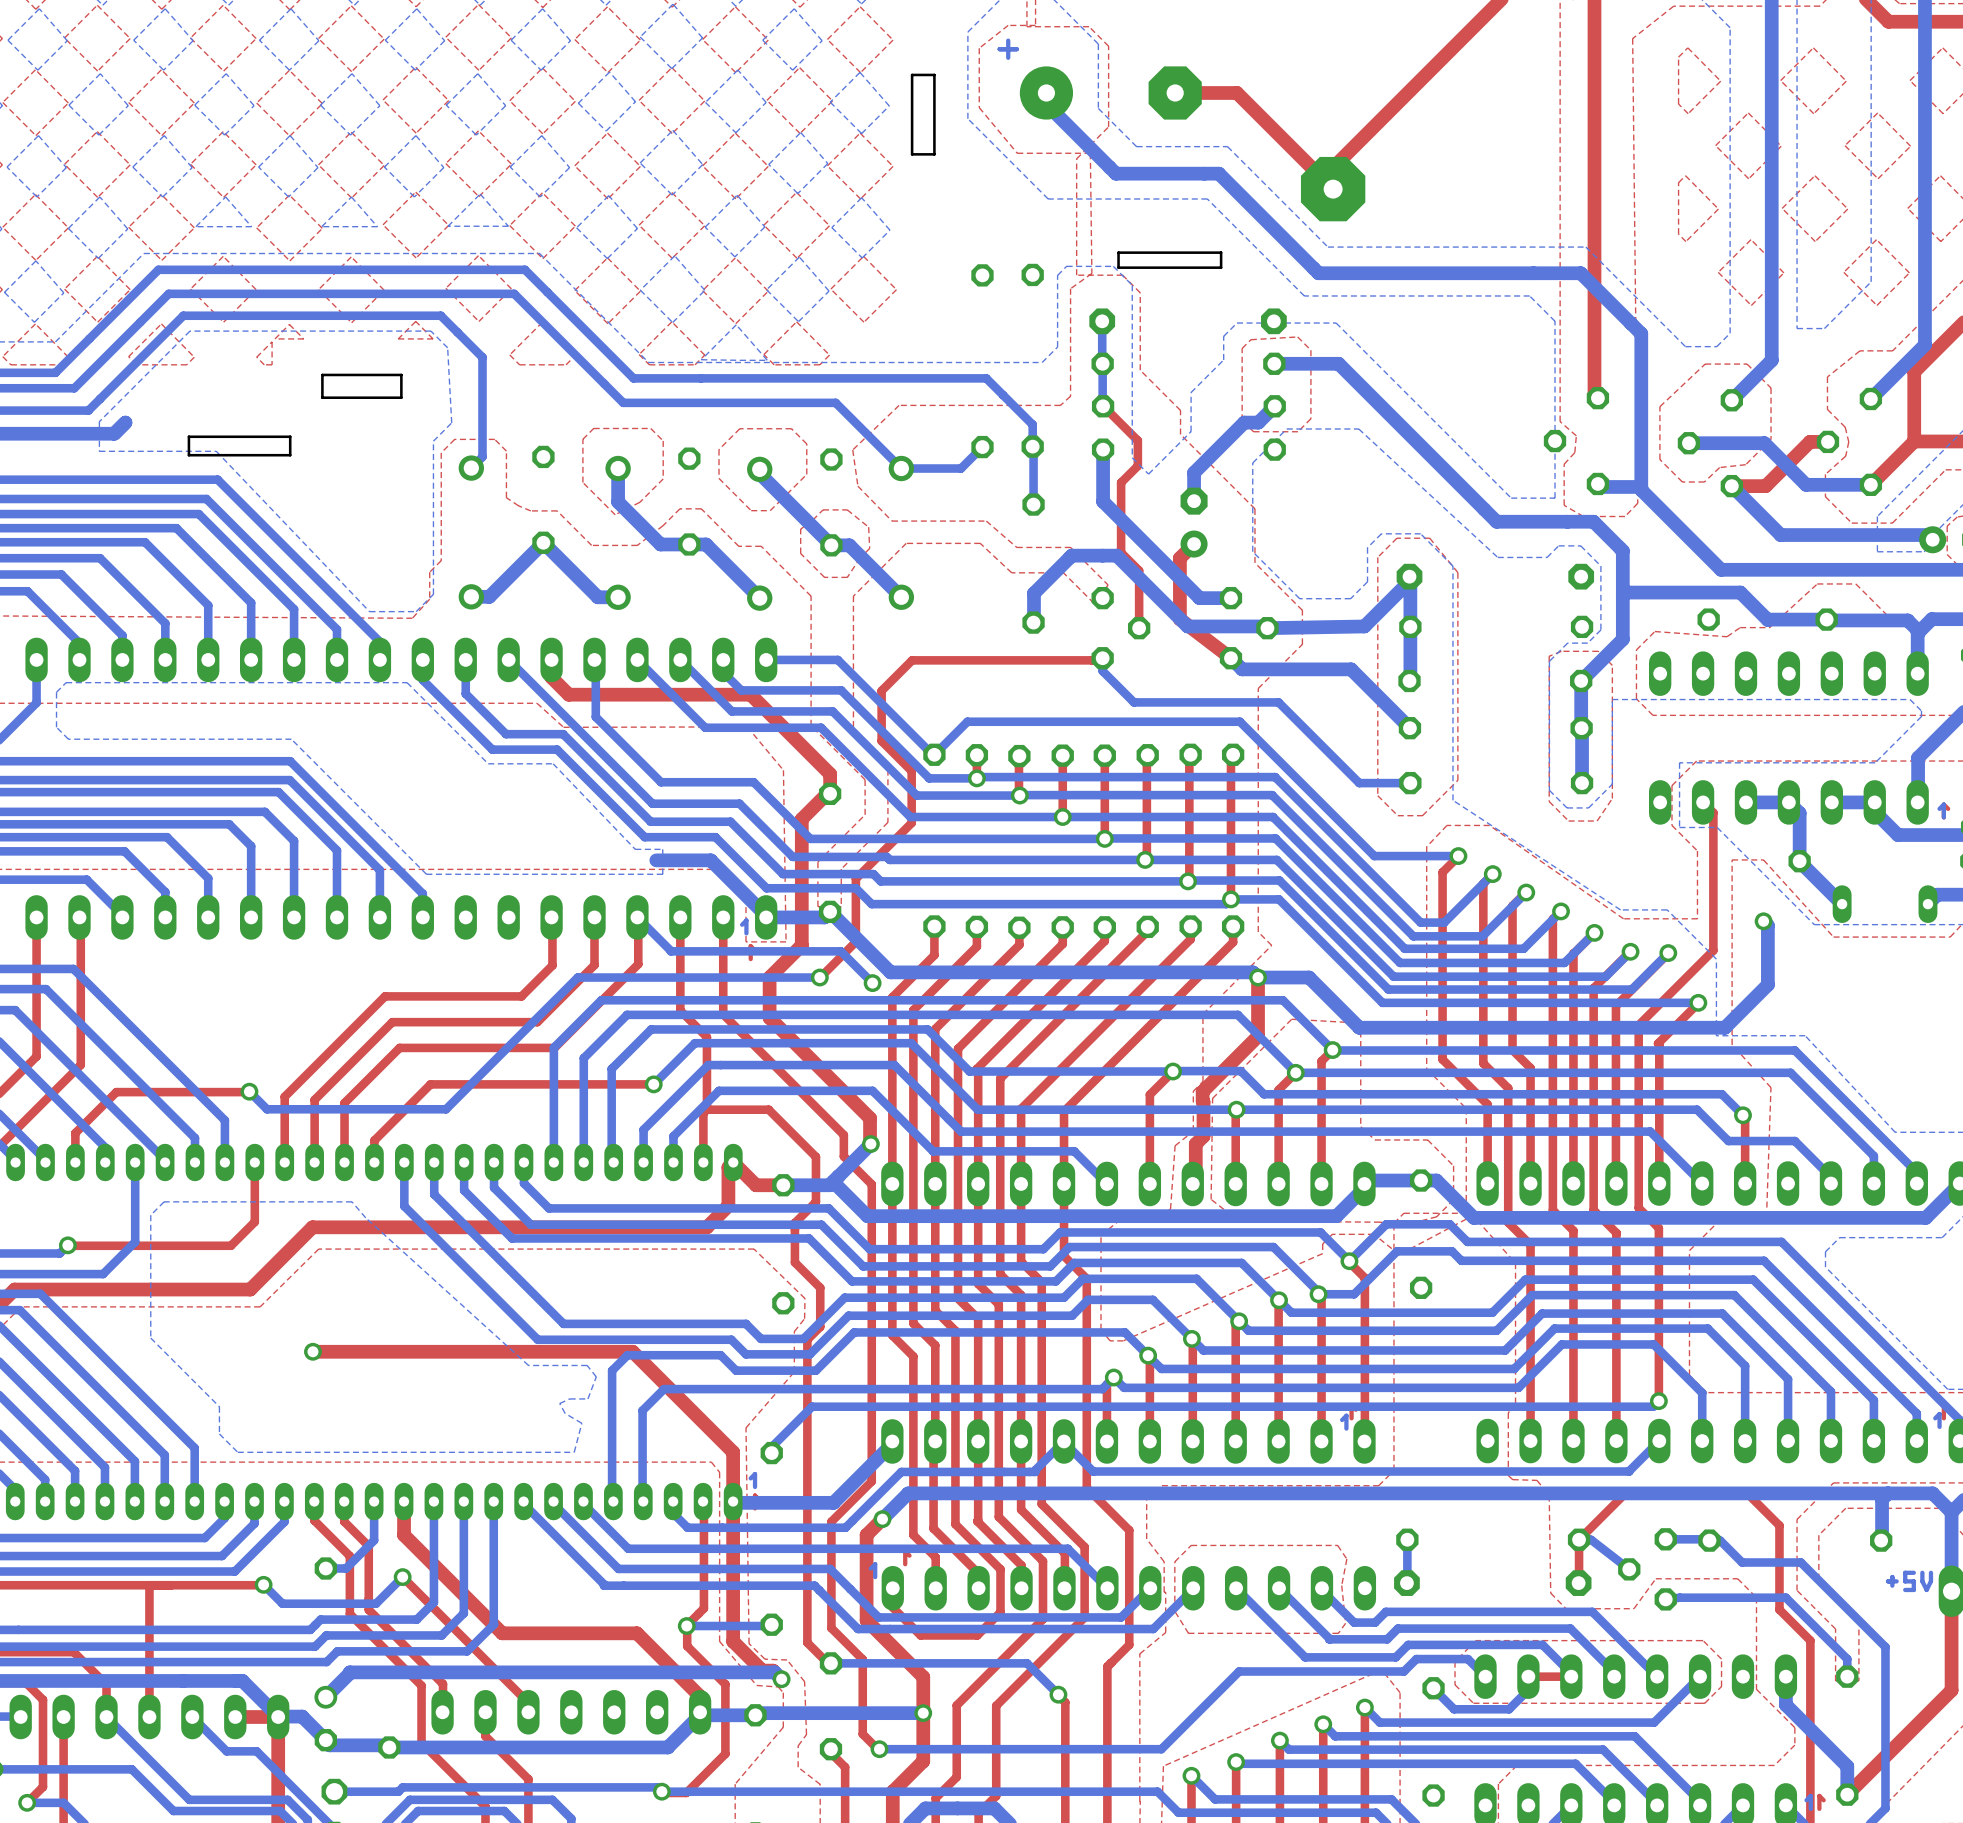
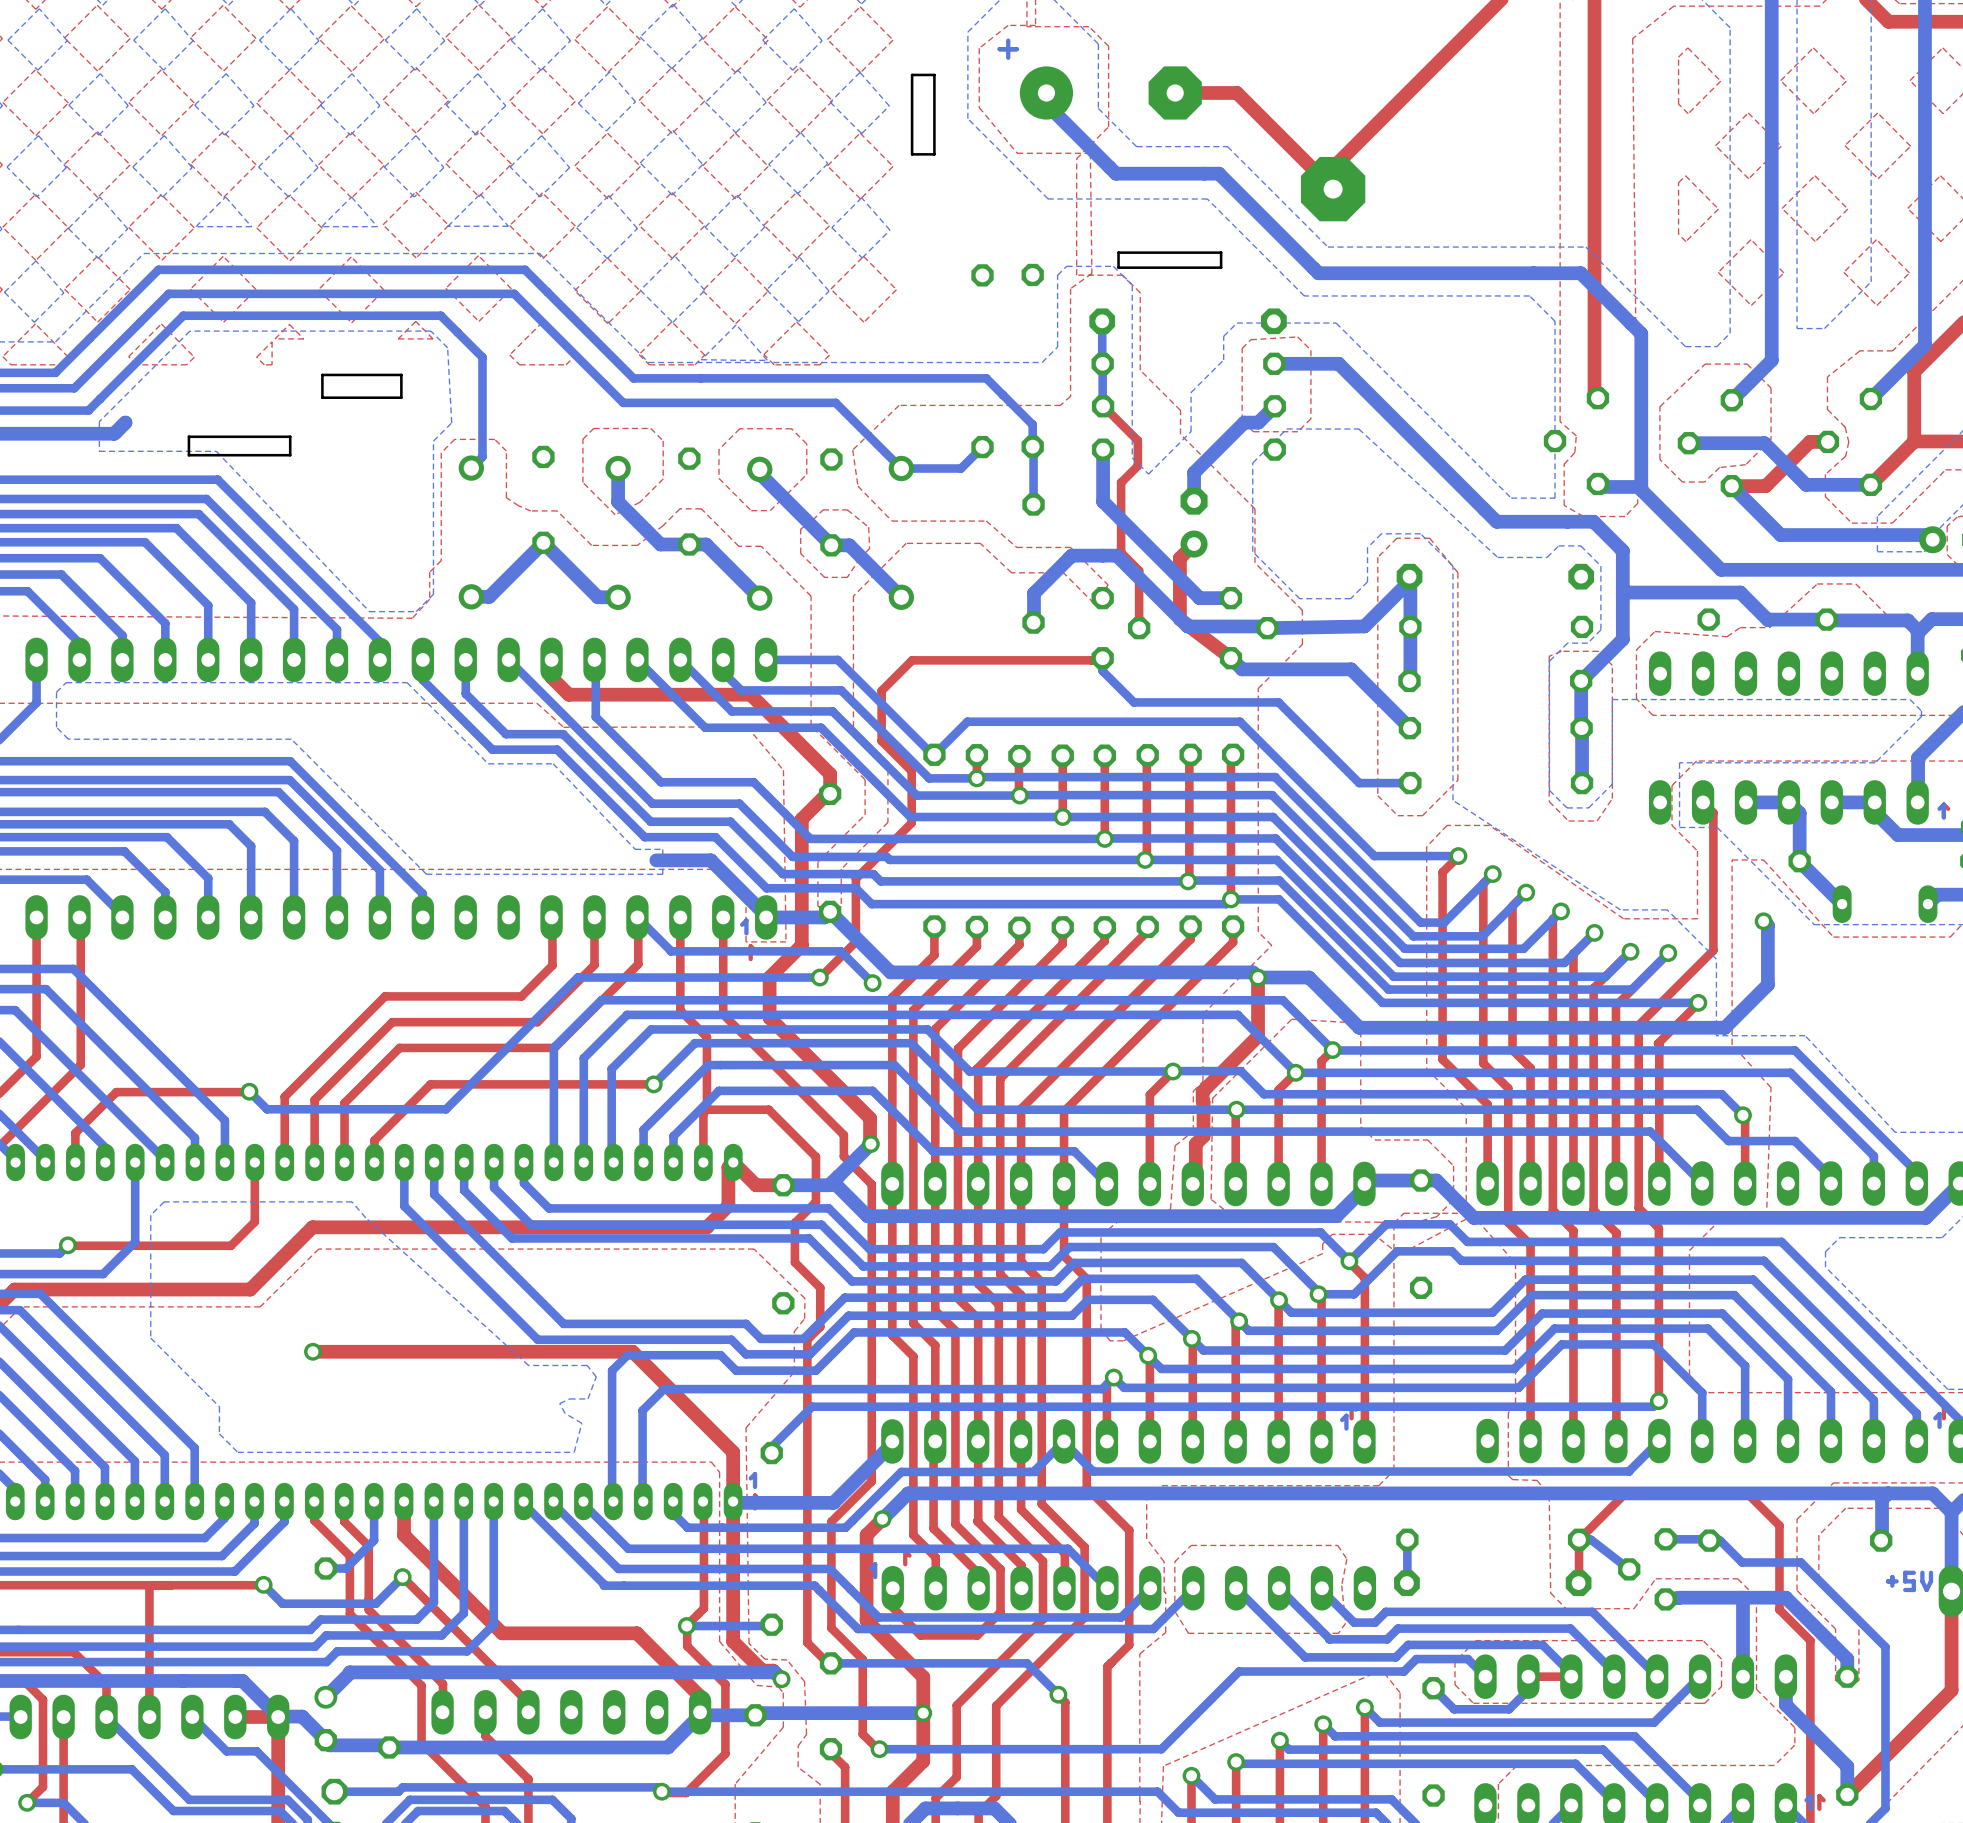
bottom track: none -> (1742, 1597) (1742, 1676)
bottom track width: thin (1665, 1599) (1679, 1597) (1785, 1597) (1847, 1659) (1847, 1676) -> thick (1665, 1599) (1679, 1597) (1785, 1597) (1847, 1659) (1847, 1676)

